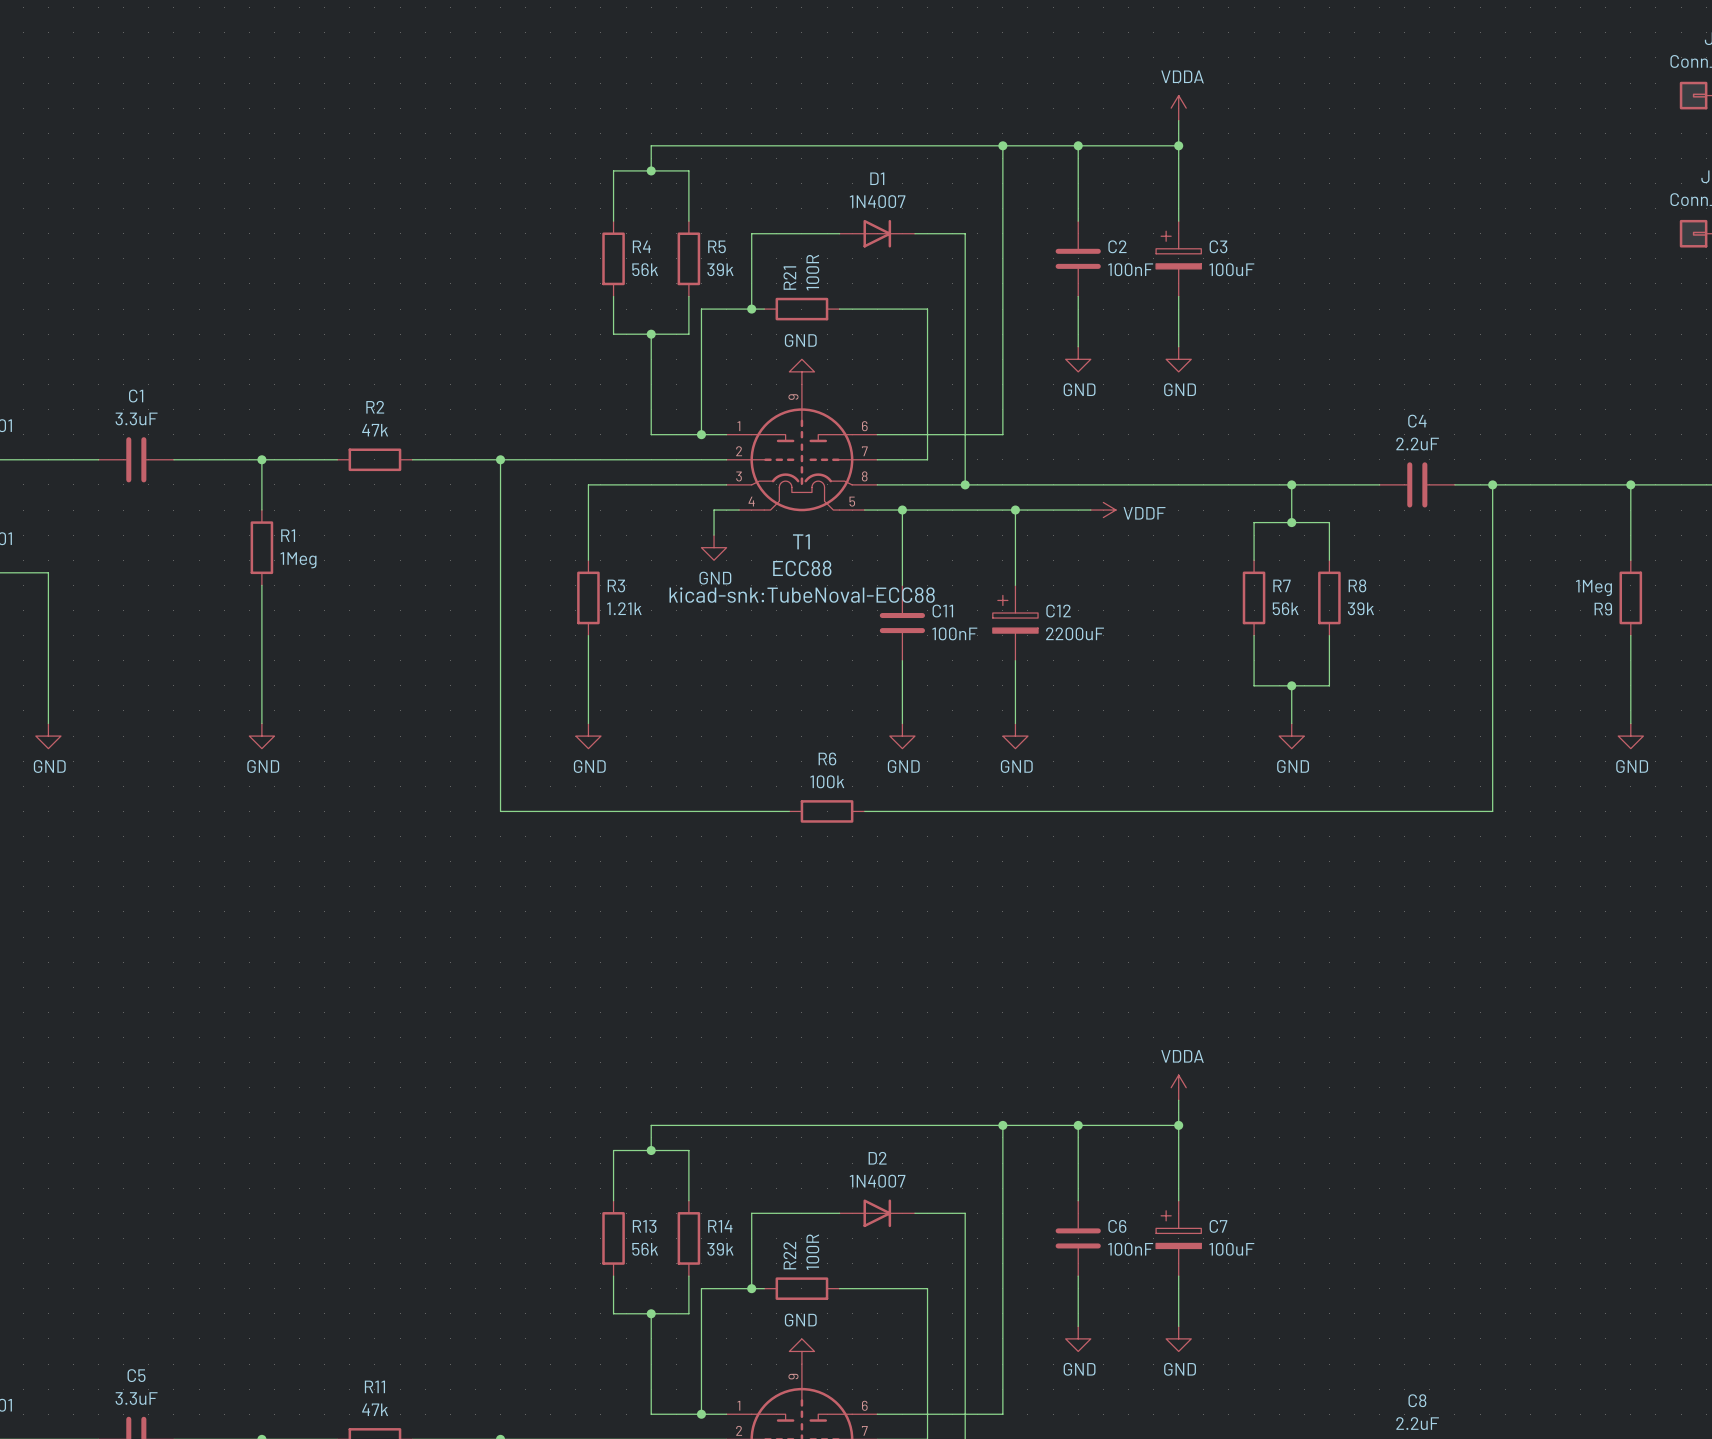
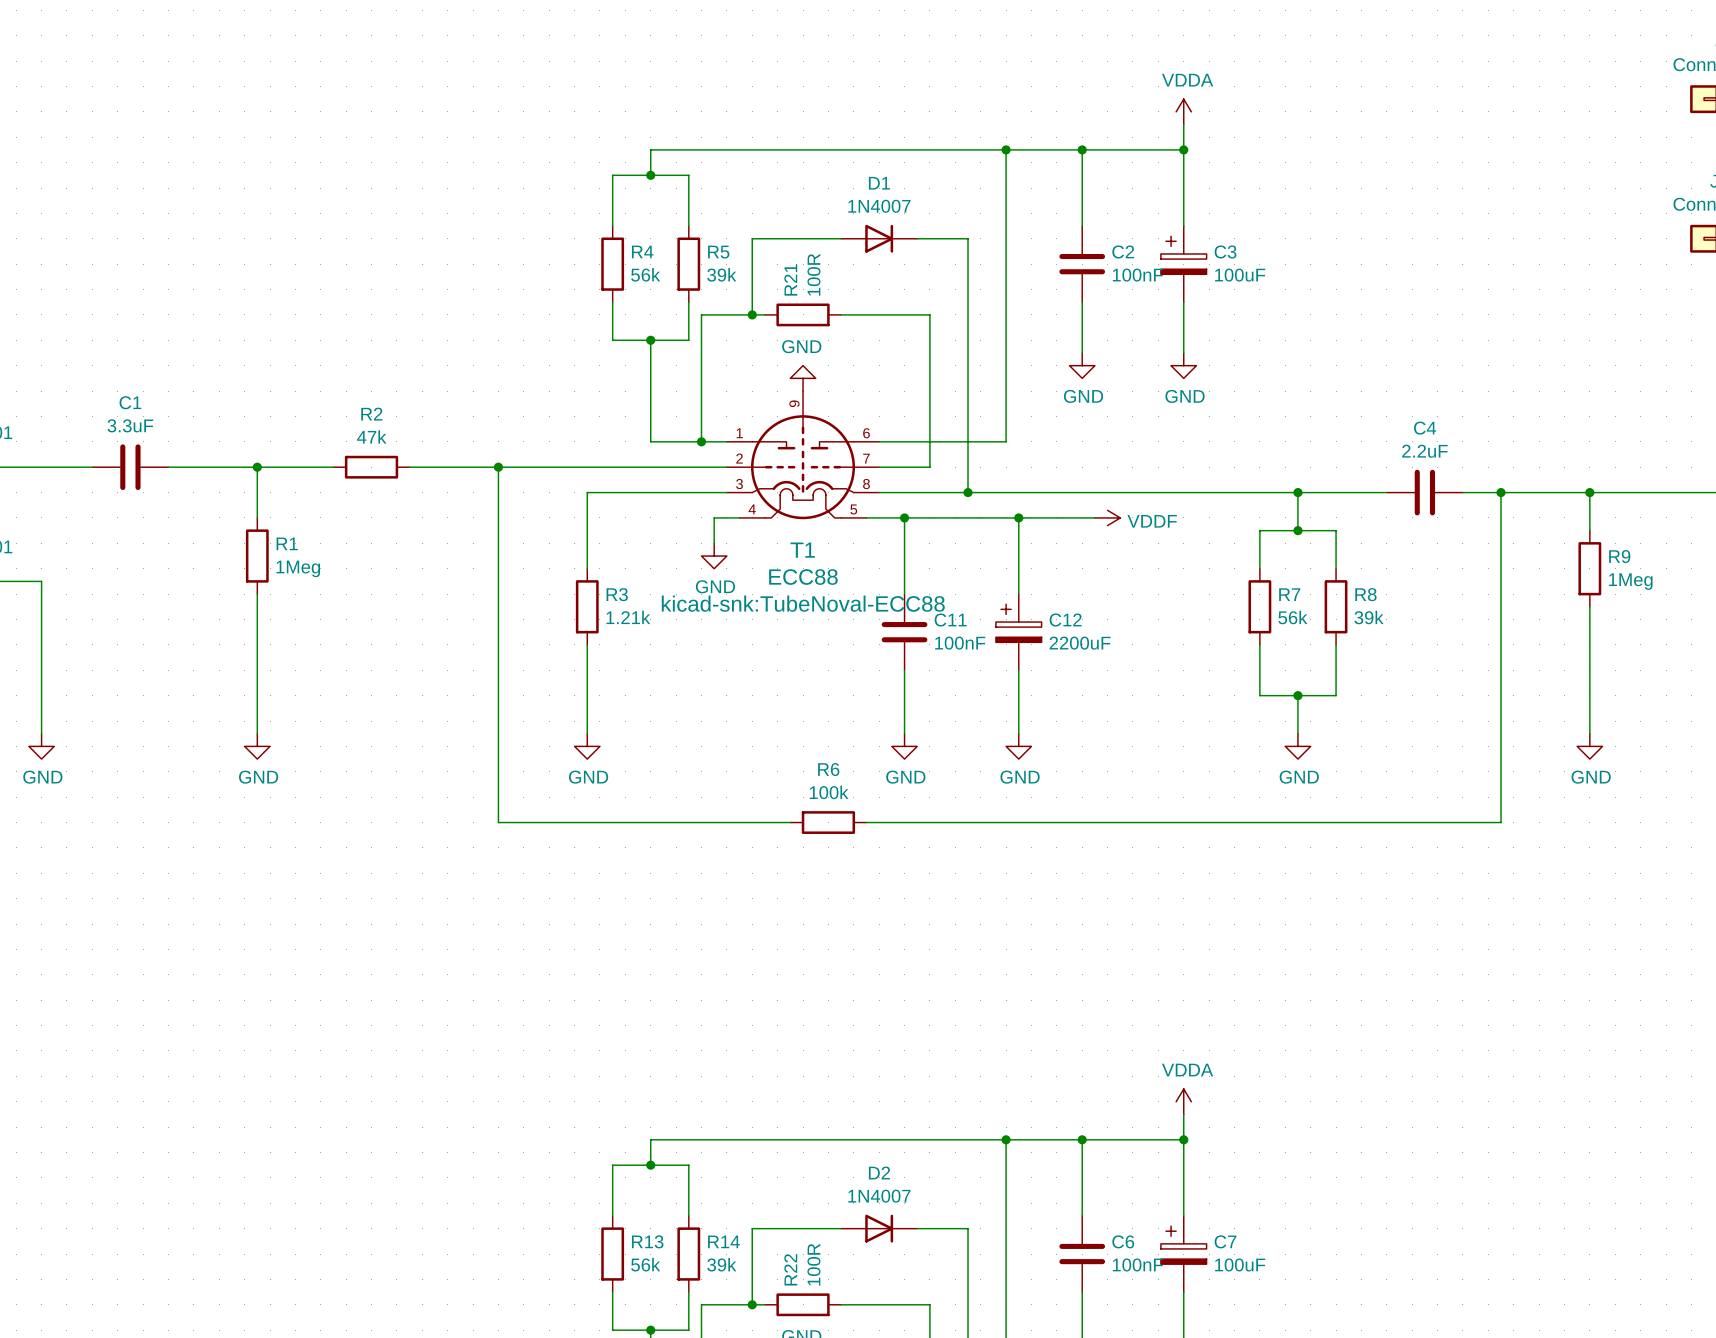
wire: none -> (1589, 492) (1589, 530)
wire: (1630, 484) (1630, 560) -> none
junction position: (1630, 484) -> (1589, 492)
R9 value position: 1Meg (1593, 587) -> 1Meg (1630, 581)
wire: none -> (1589, 606) (1589, 733)
R9 position: (1630, 597) -> (1589, 568)
R9 name position: R9 (1603, 609) -> R9 (1619, 556)
wire: (1630, 635) (1630, 723) -> none
power symbol position: GND (1630, 736) -> GND (1589, 746)

